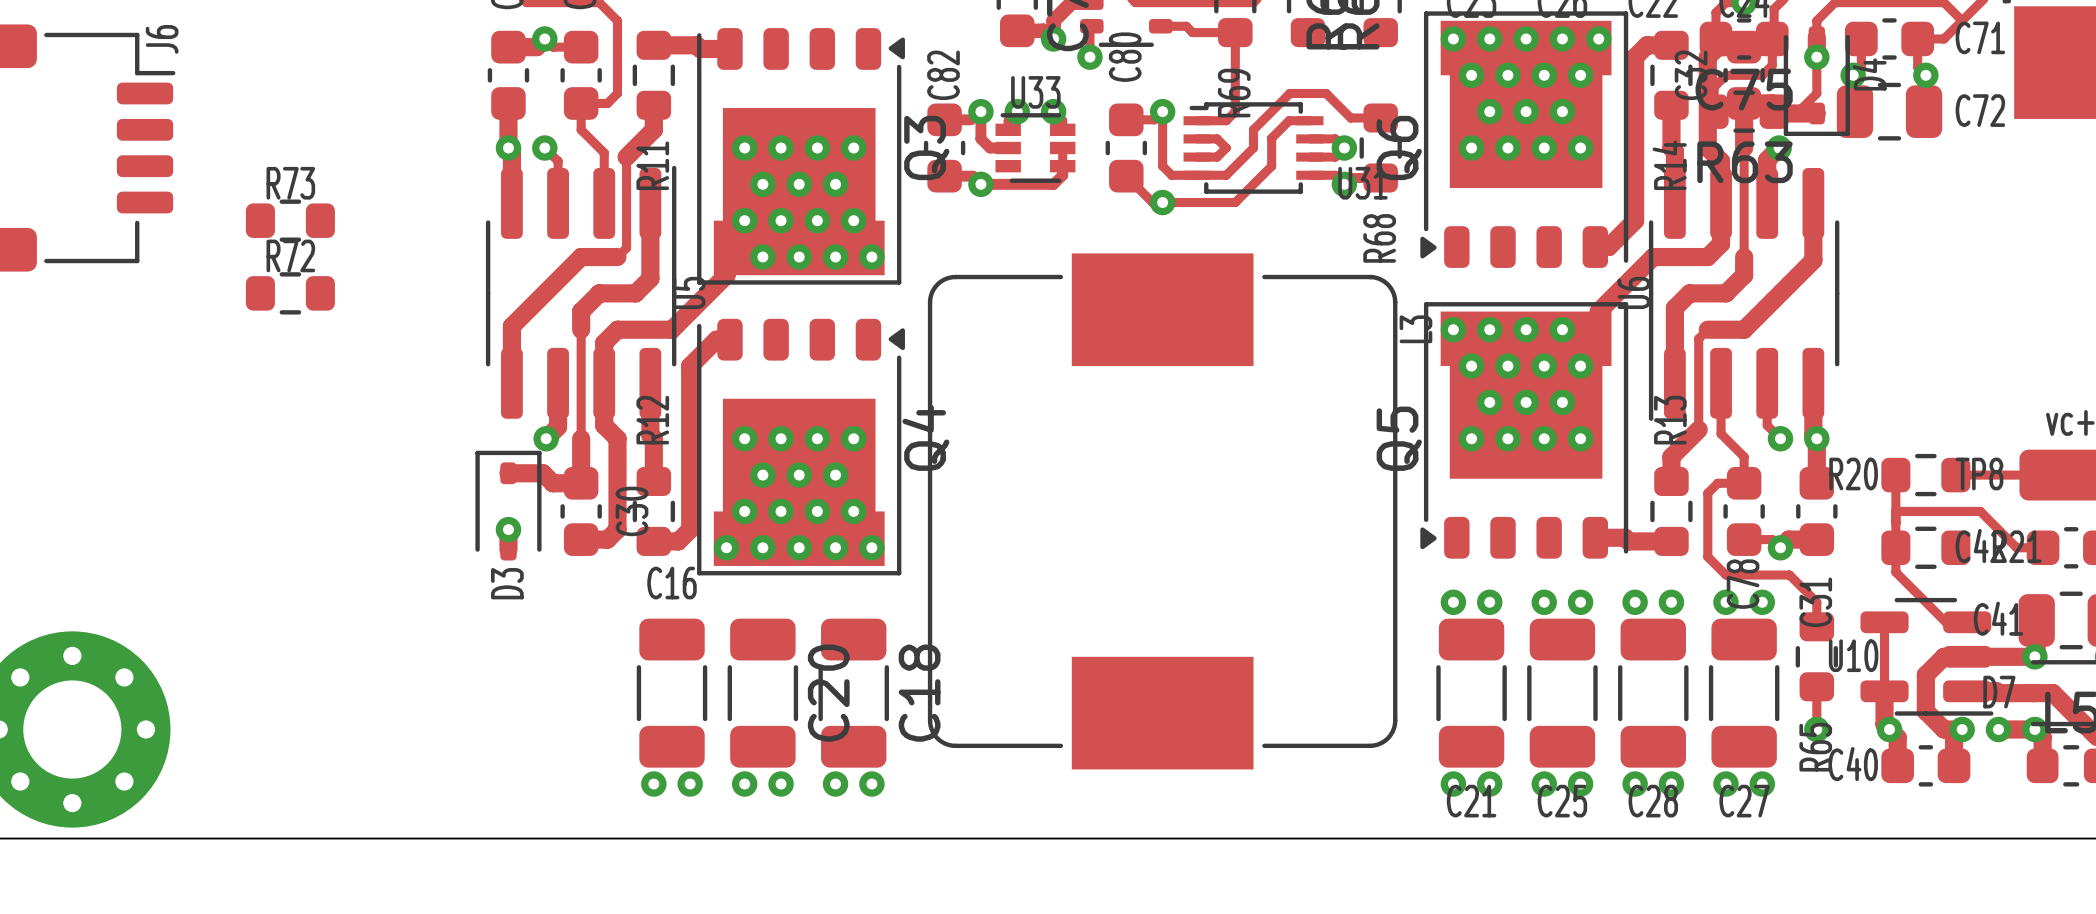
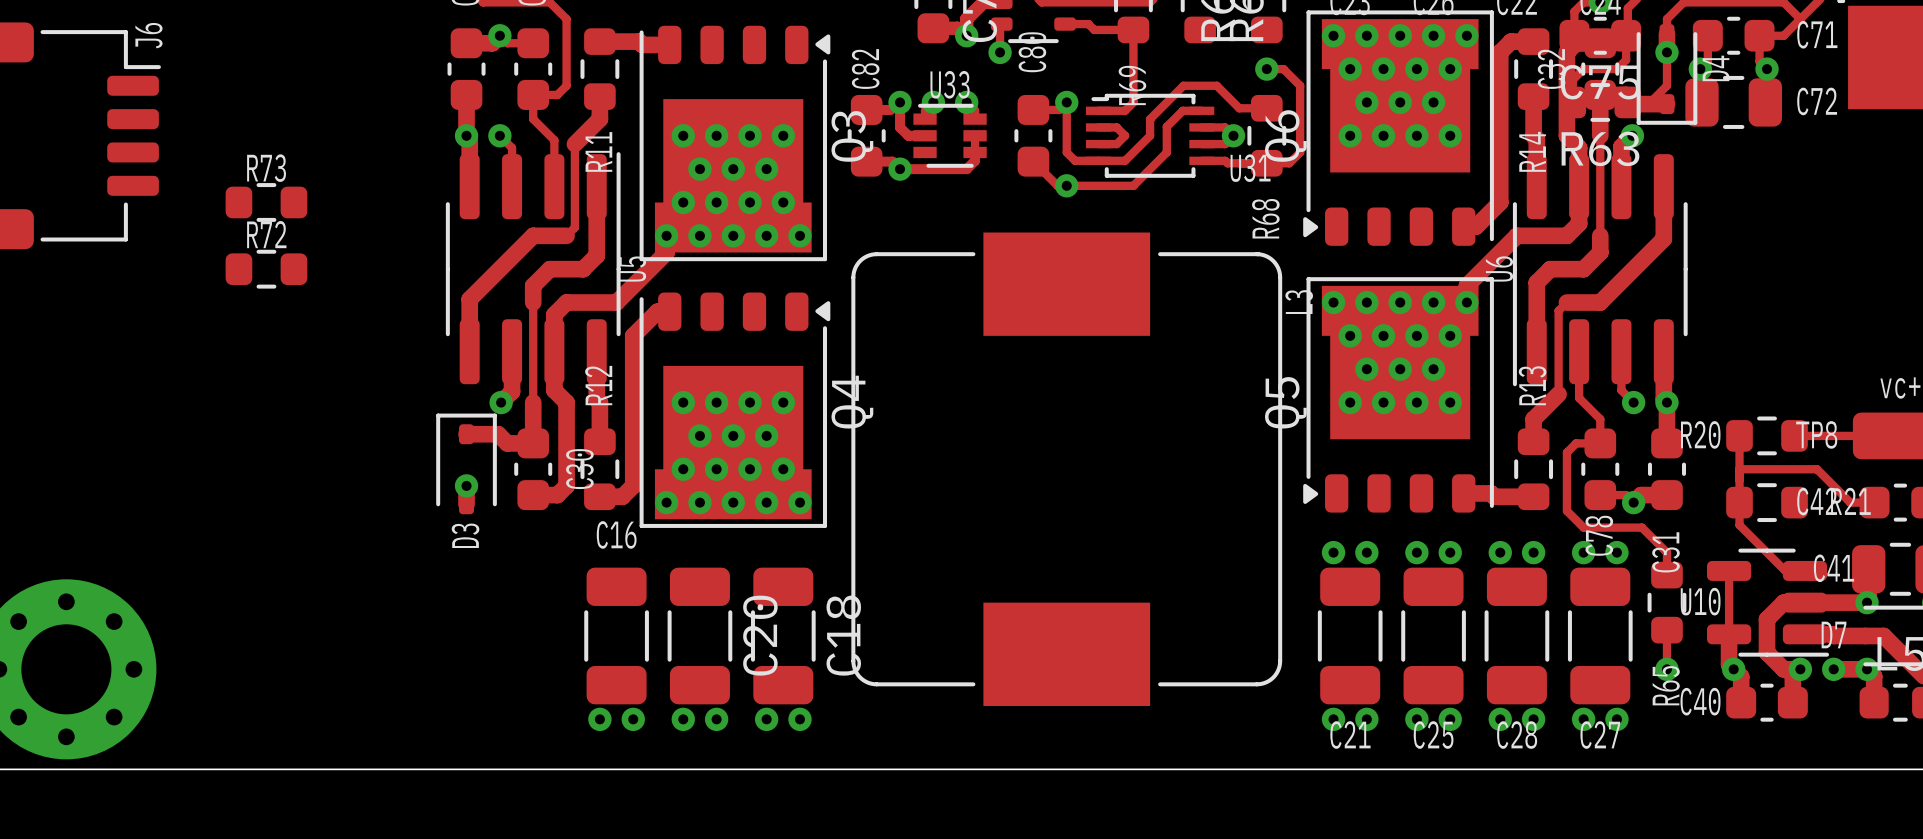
track: none -> (1266, 69) (1283, 69) (1300, 85) (1300, 152) (1289, 163) (1266, 163)
via position: (1344, 184) -> (1266, 69)
via: none -> (666, 235)
via: none -> (1466, 302)

